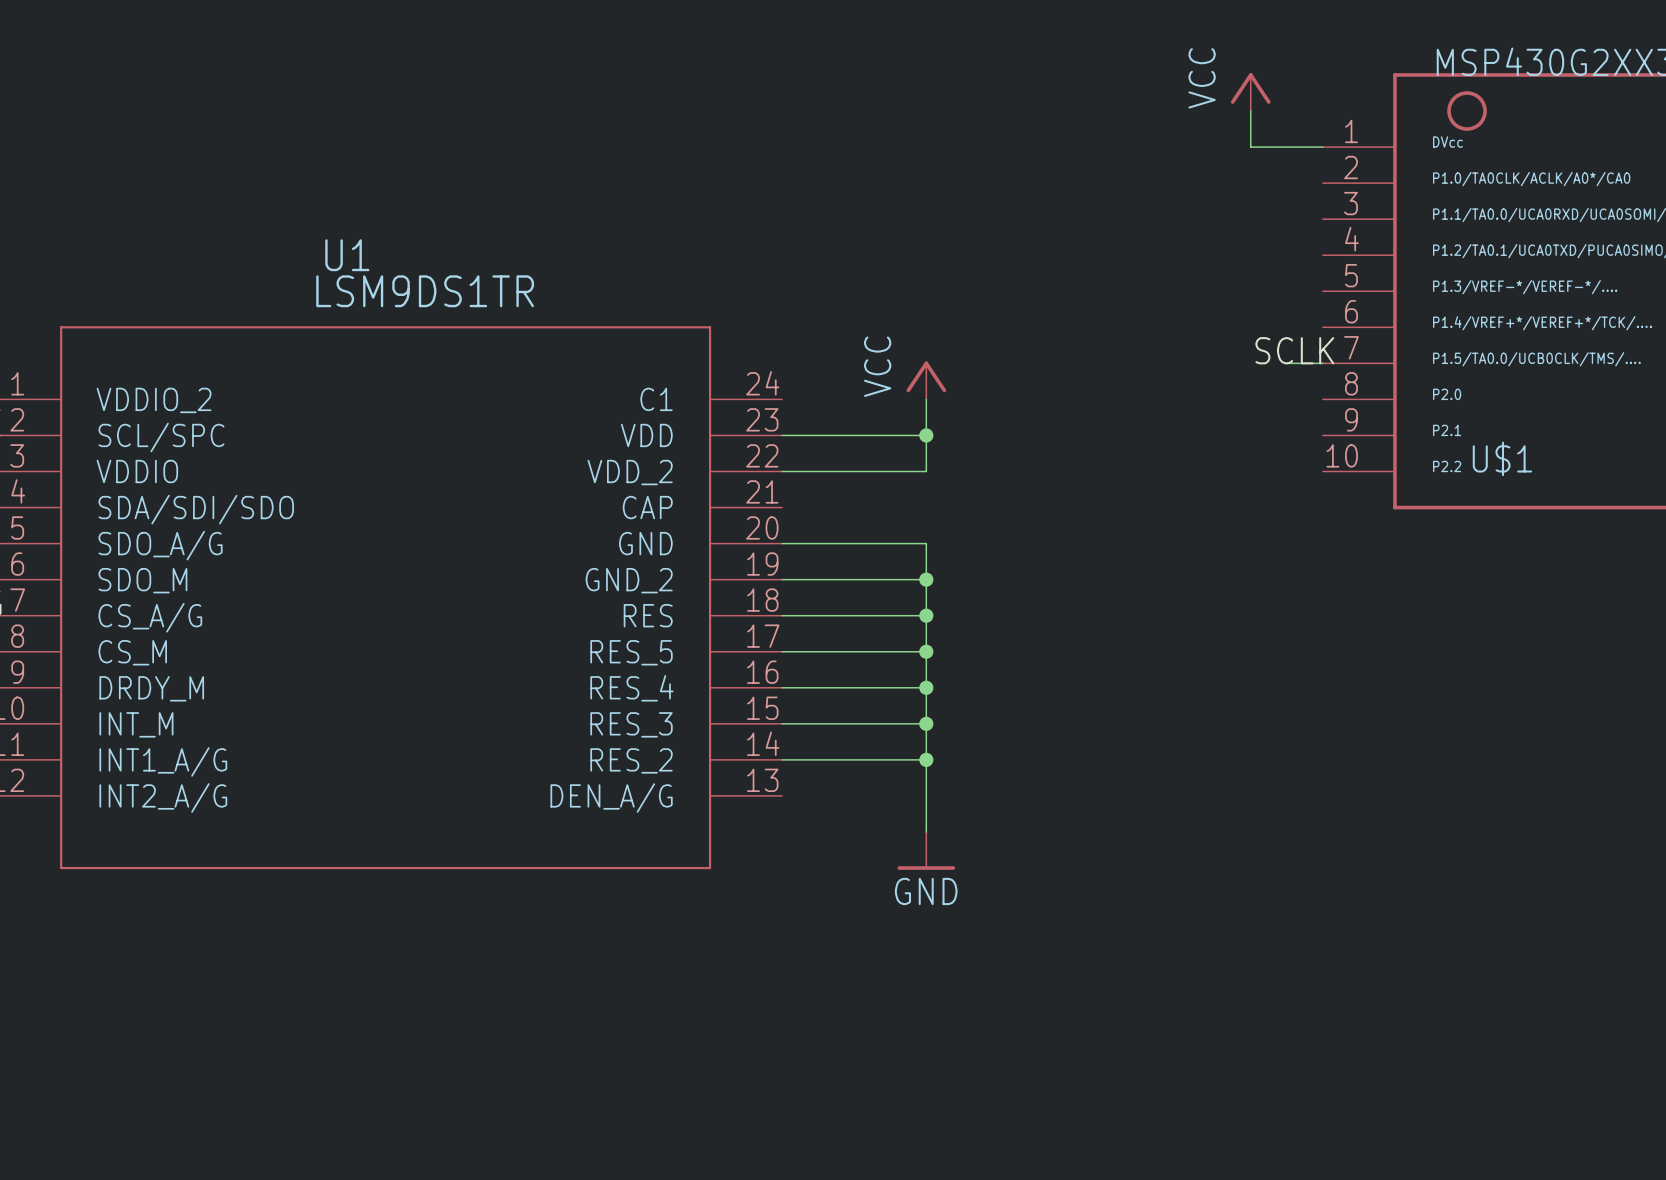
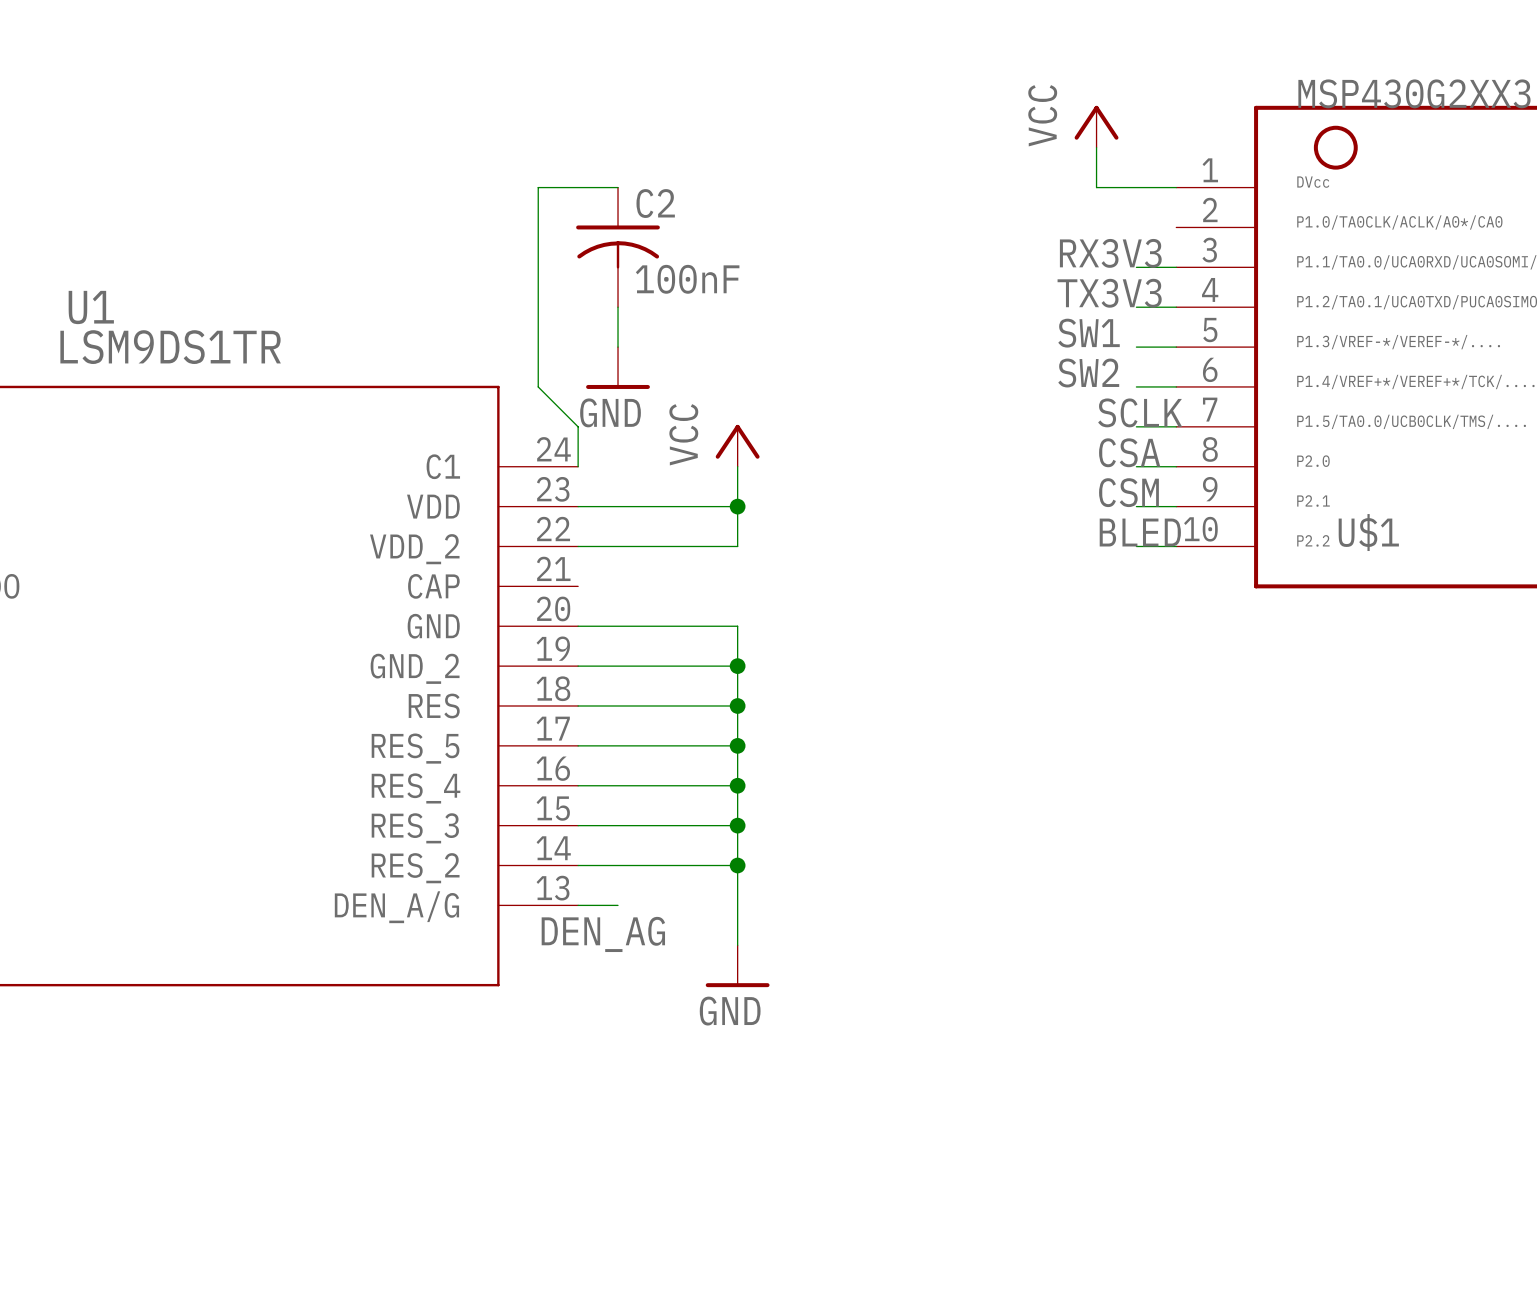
wire: none -> (618, 187) (538, 187) (538, 386) (578, 426) (578, 466)
C2: none -> 100nF (618, 247)
label: none -> RX3V3 (1110, 253)
wire: none -> (1136, 267) (1176, 267)
label: none -> TX3V3 (1109, 293)
wire: none -> (618, 307) (618, 347)
wire: none -> (1136, 307) (1176, 307)
label: none -> SW1 (1089, 333)
wire: none -> (1136, 347) (1176, 347)
power symbol: none -> GND (618, 368)
label: none -> SW2 (1088, 373)
wire: none -> (1136, 386) (1176, 386)
label: none -> CSA (1129, 452)
wire: none -> (1136, 466) (1176, 466)
label: none -> CSM (1128, 492)
wire: none -> (1136, 506) (1176, 506)
label: none -> BLED (1140, 532)
wire: none -> (1136, 546) (1176, 546)
wire: none -> (578, 905) (618, 905)
label: none -> DEN_AG (603, 934)

